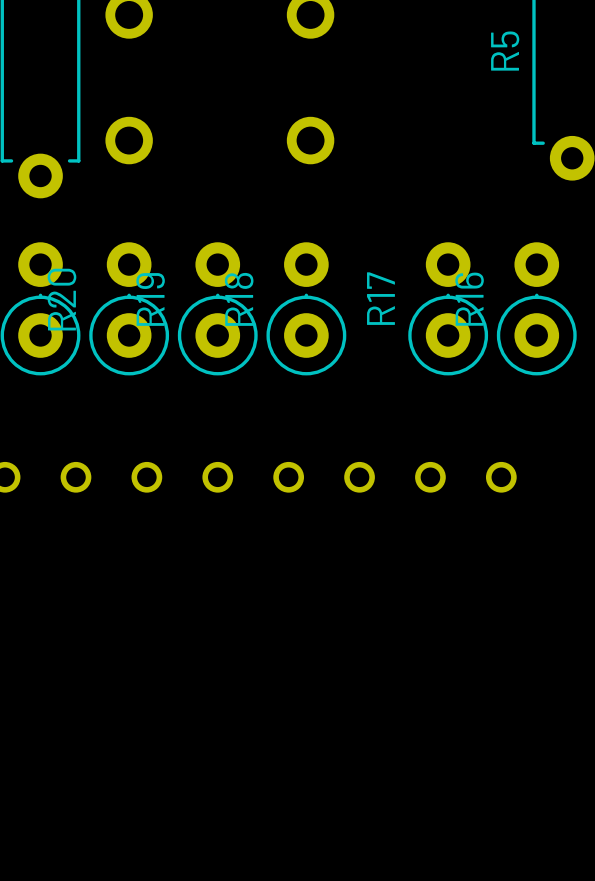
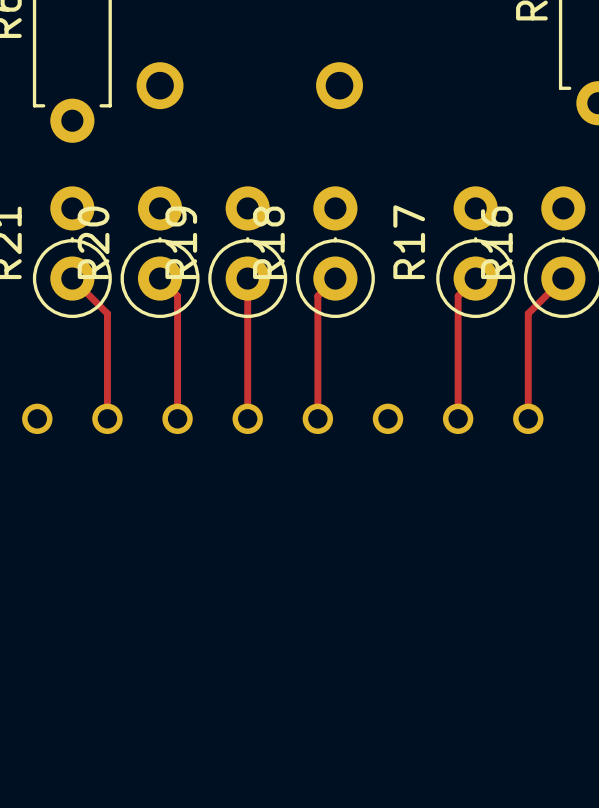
track: none -> (72, 278) (107, 313) (107, 418)
track: none -> (160, 278) (177, 296) (177, 418)
track: none -> (247, 278) (247, 418)
track: none -> (335, 278) (317, 296) (317, 418)
track: none -> (475, 278) (458, 296) (458, 418)
track: none -> (563, 278) (528, 313) (528, 418)

